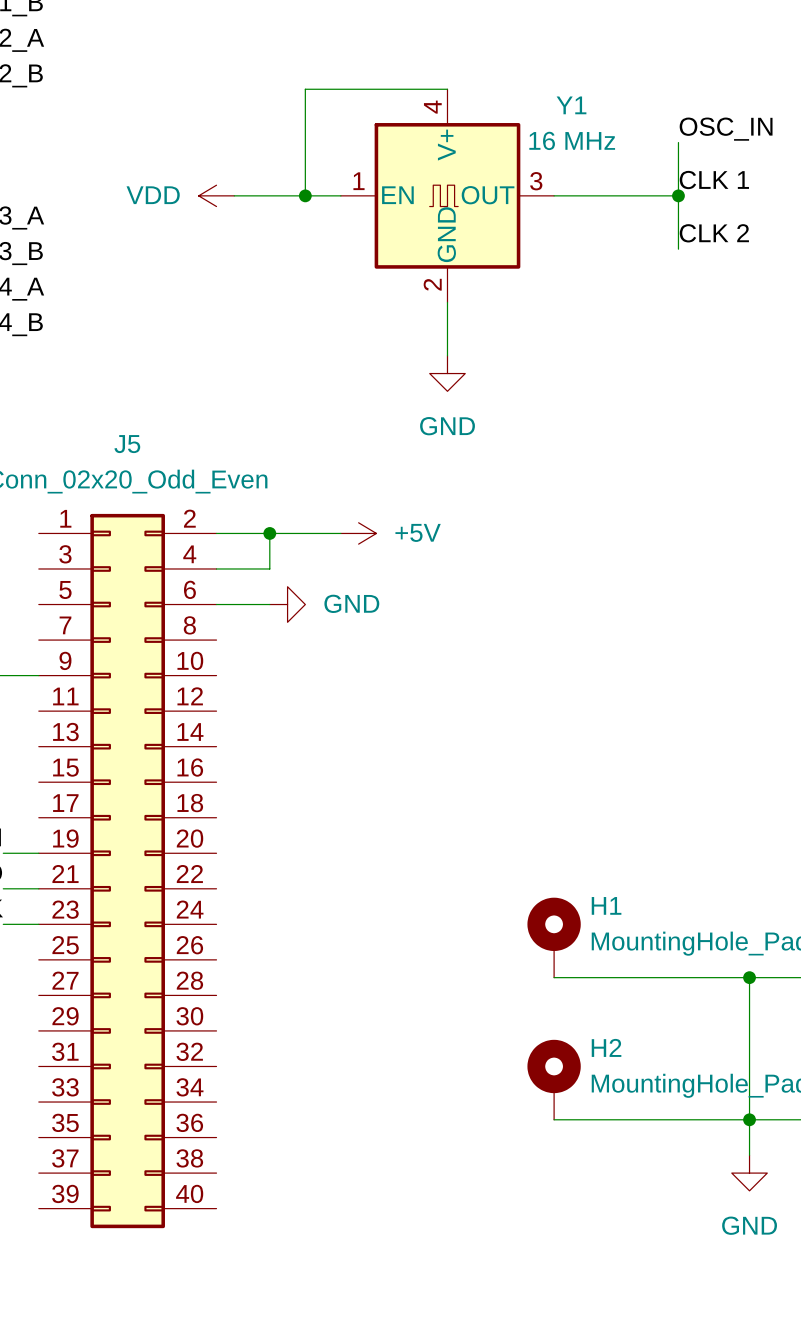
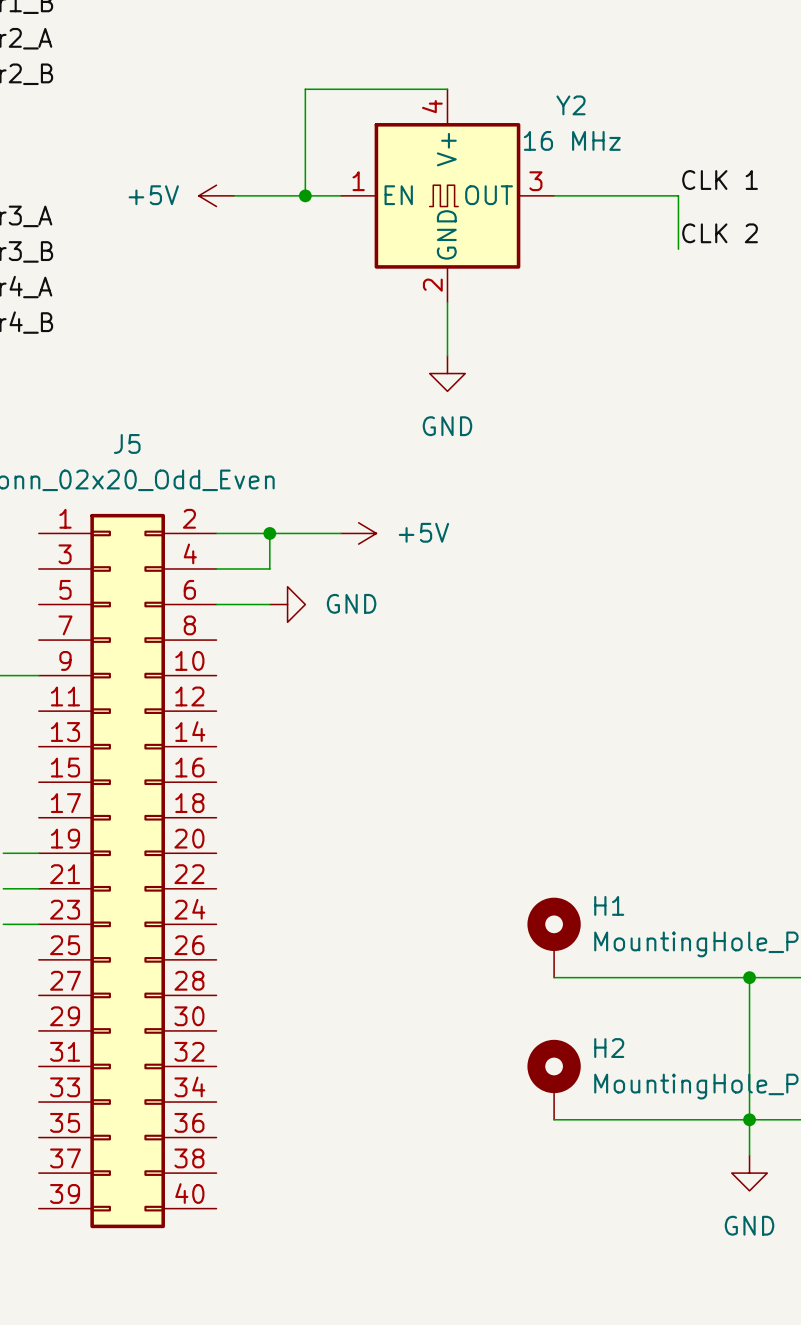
Y1 name: Y1 (571, 105) -> Y2 (571, 105)
label: OSC_IN (726, 129) -> none
wire: (678, 142) (678, 195) -> none
power symbol: VDD (216, 195) -> +5V (216, 195)
junction: (678, 195) -> none

